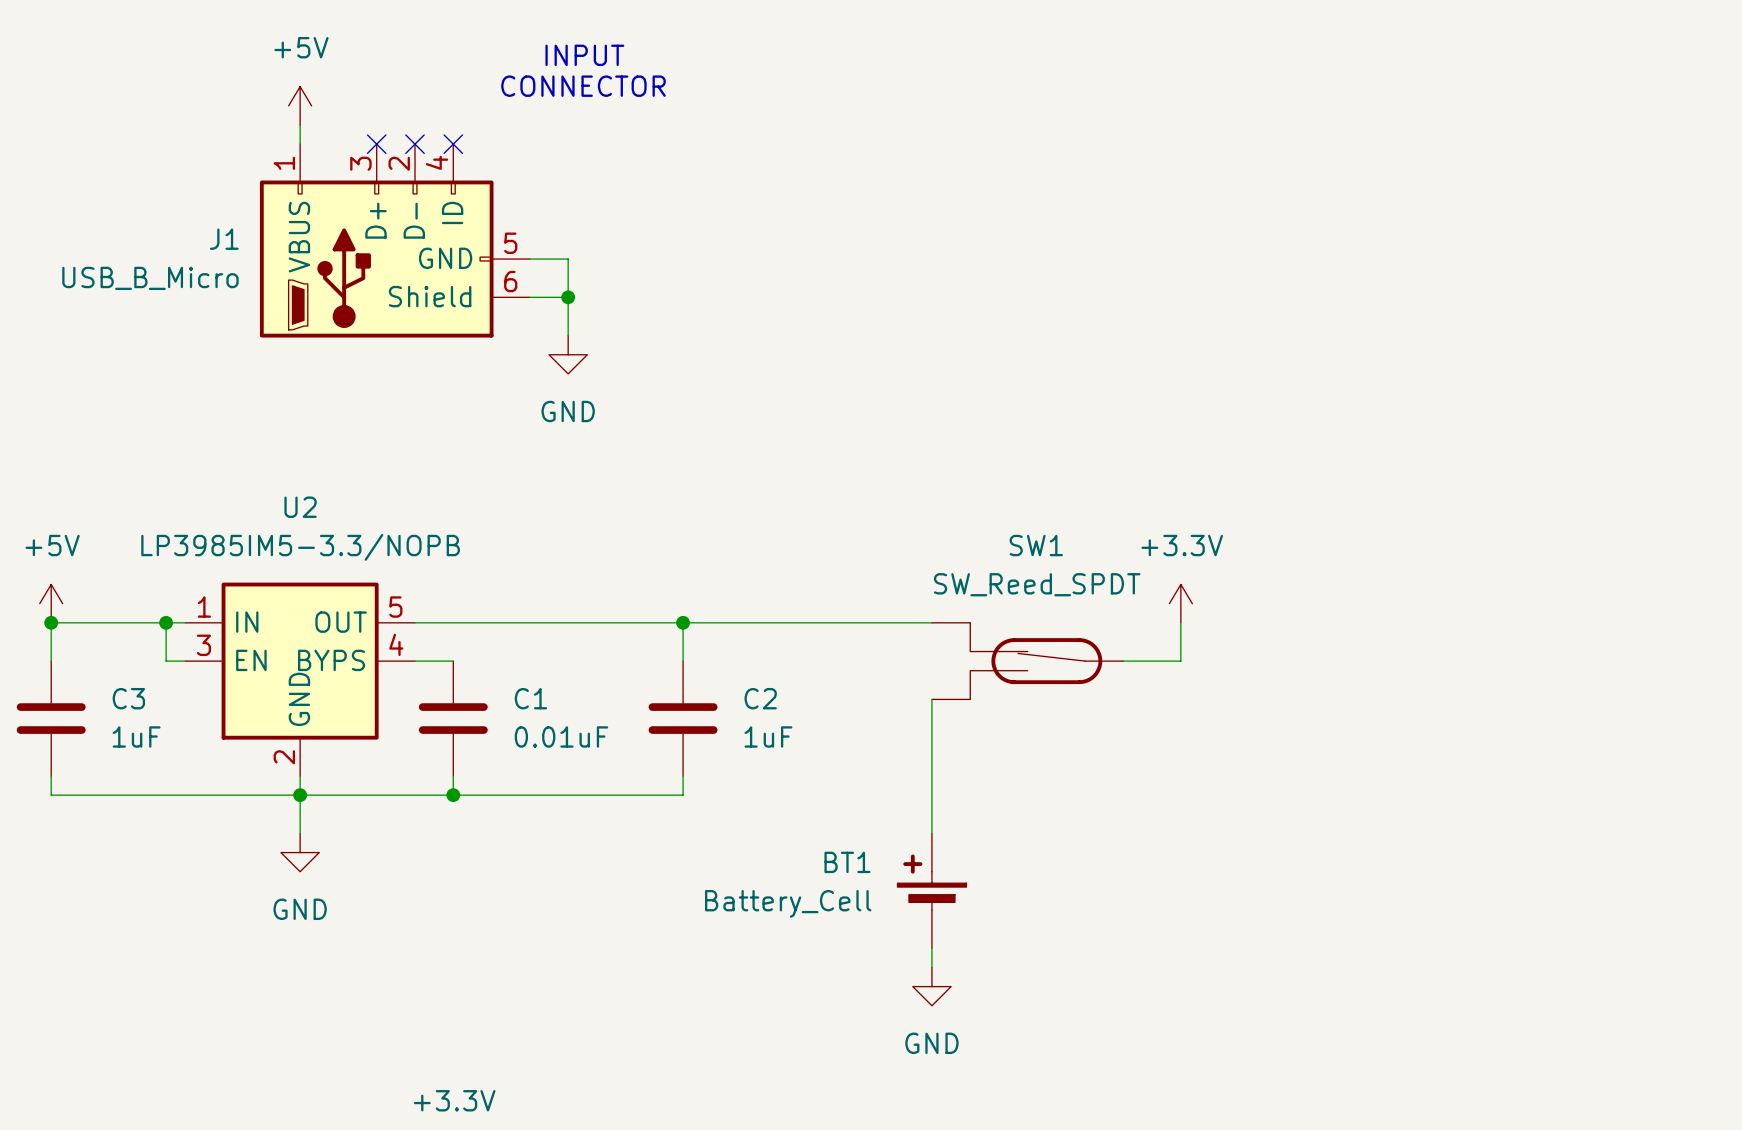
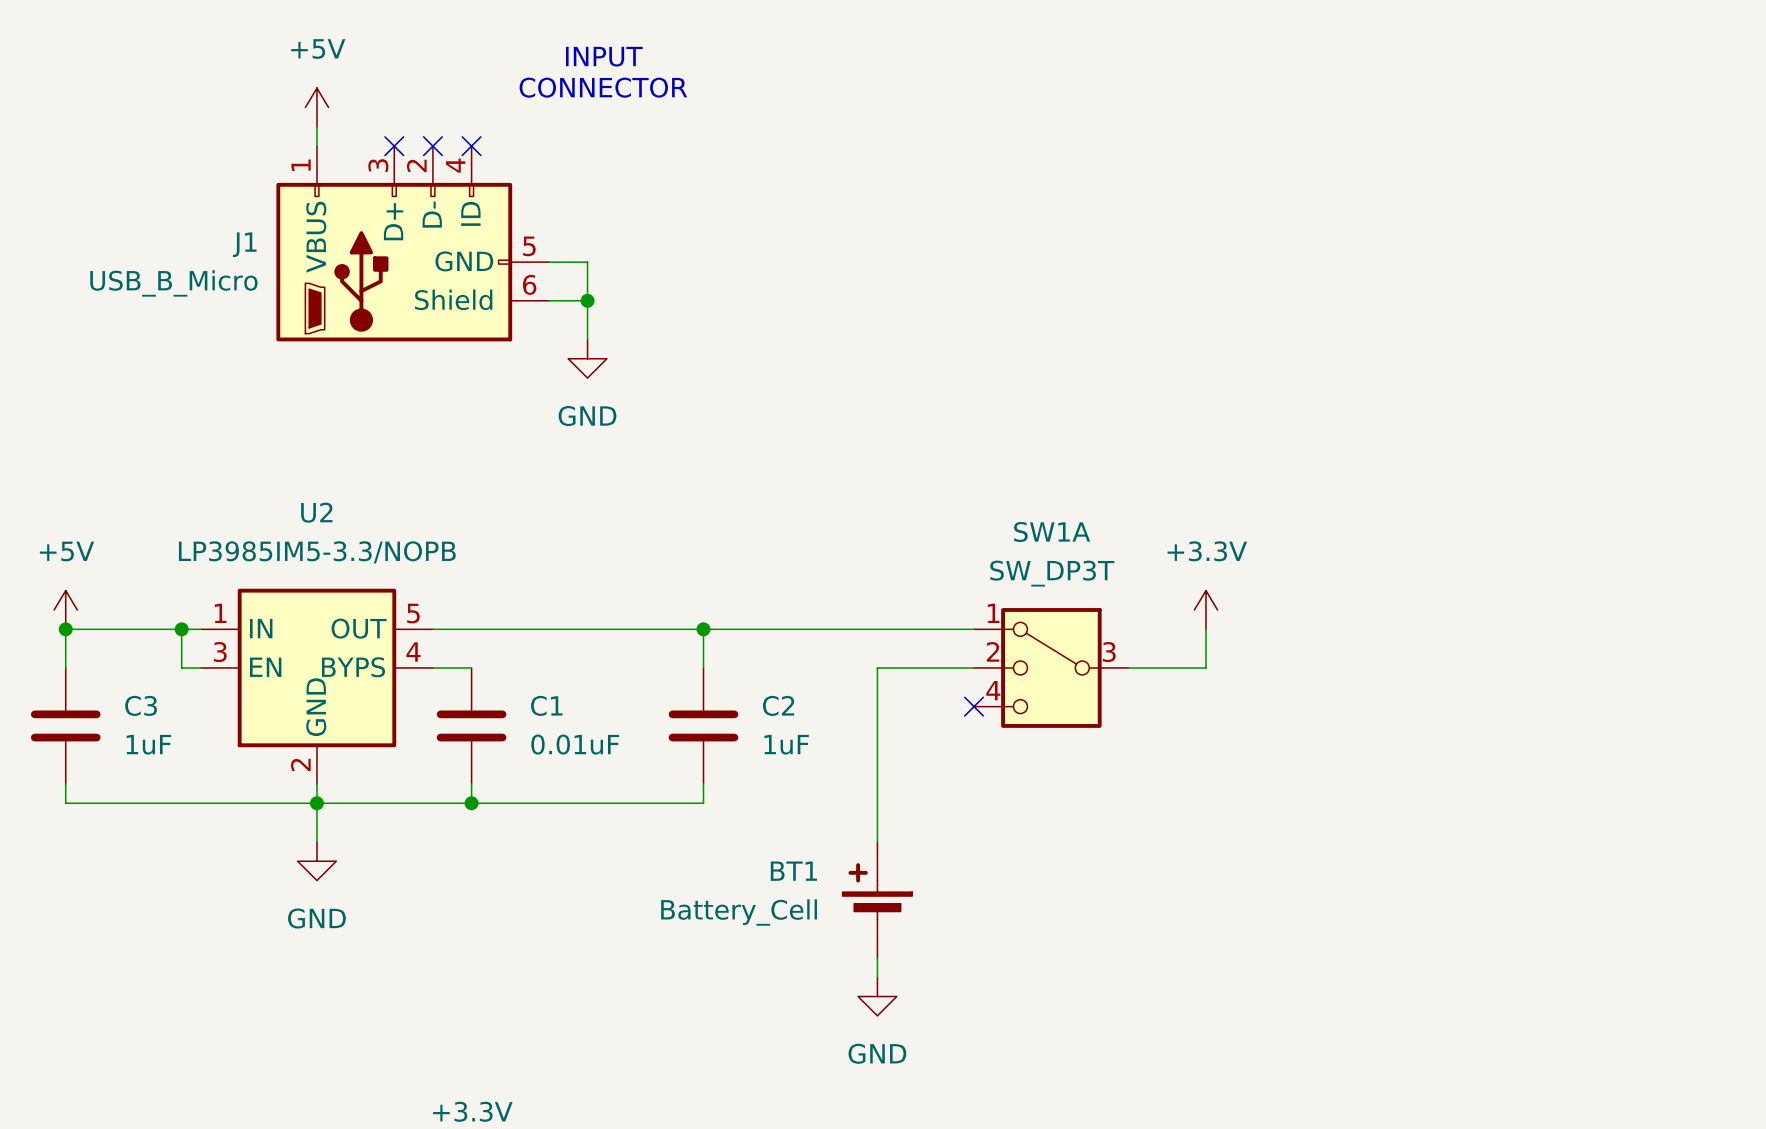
wire: none -> (974, 667) (877, 667) (877, 841)
SW1: SW_Reed_SPDT (1027, 661) -> none
SW1A: none -> SW_DP3T (1051, 667)
wire: (931, 699) (931, 833) -> none
no-connect mark: none -> (974, 706)
BT1 position: (931, 890) -> (877, 899)
wire: (931, 948) (931, 967) -> (877, 957) (877, 977)
power symbol position: GND (931, 986) -> GND (877, 996)

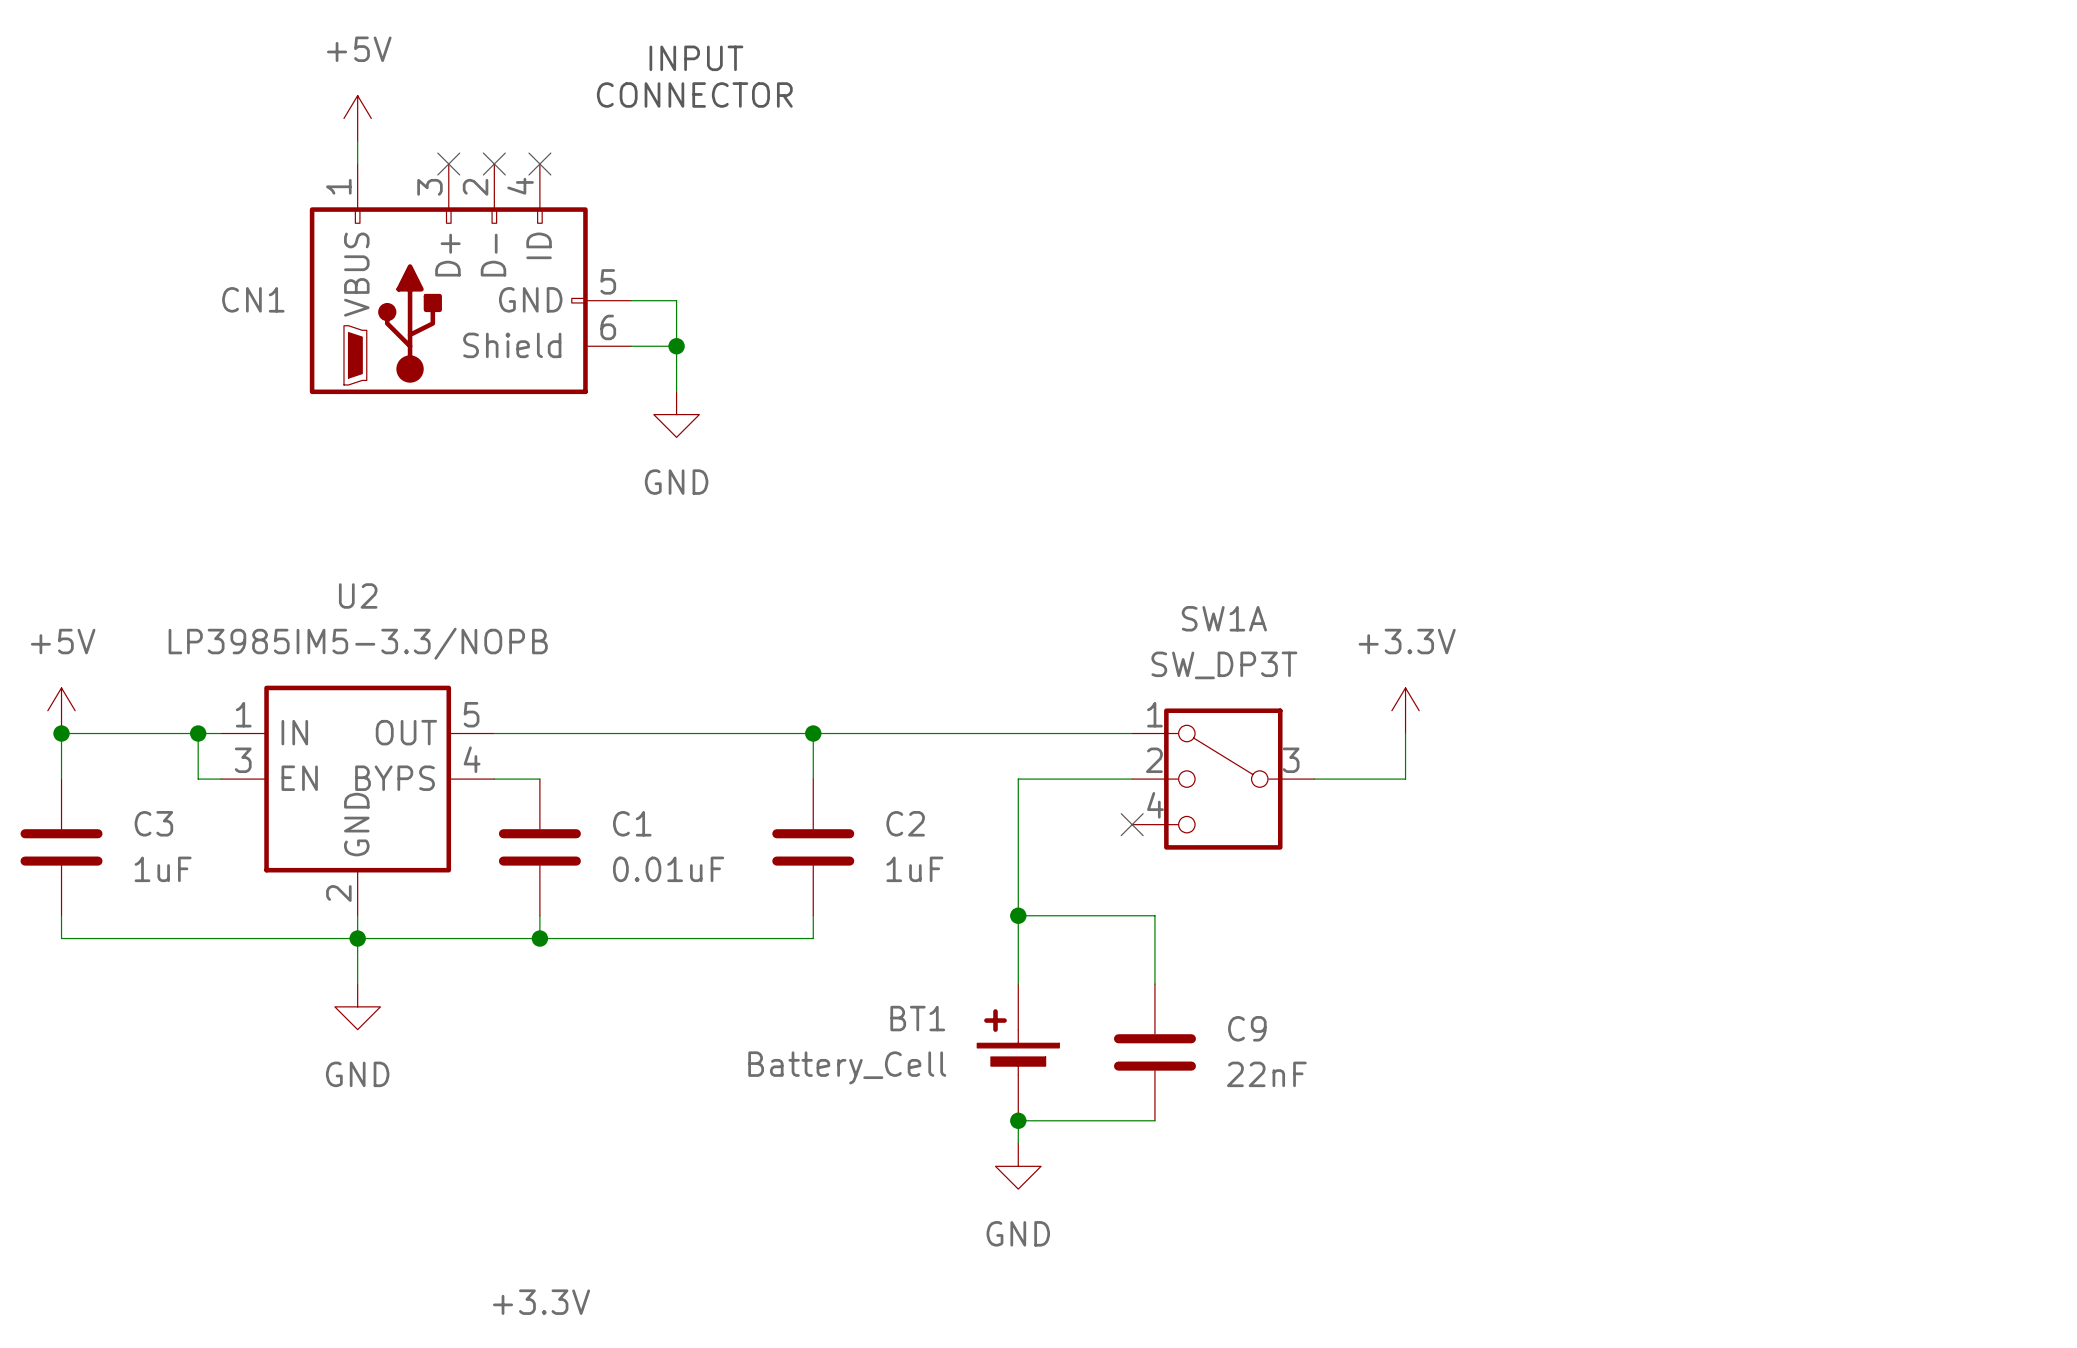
J1 name: J1 (244, 244) -> CN1 (253, 299)
J1 value: USB_B_Micro (173, 283) -> none
wire: none -> (1018, 915) (1154, 915) (1154, 984)
junction: none -> (1018, 915)
C9: none -> 22nF (1154, 1052)
wire: none -> (1018, 1120) (1154, 1120)
junction: none -> (1018, 1120)

